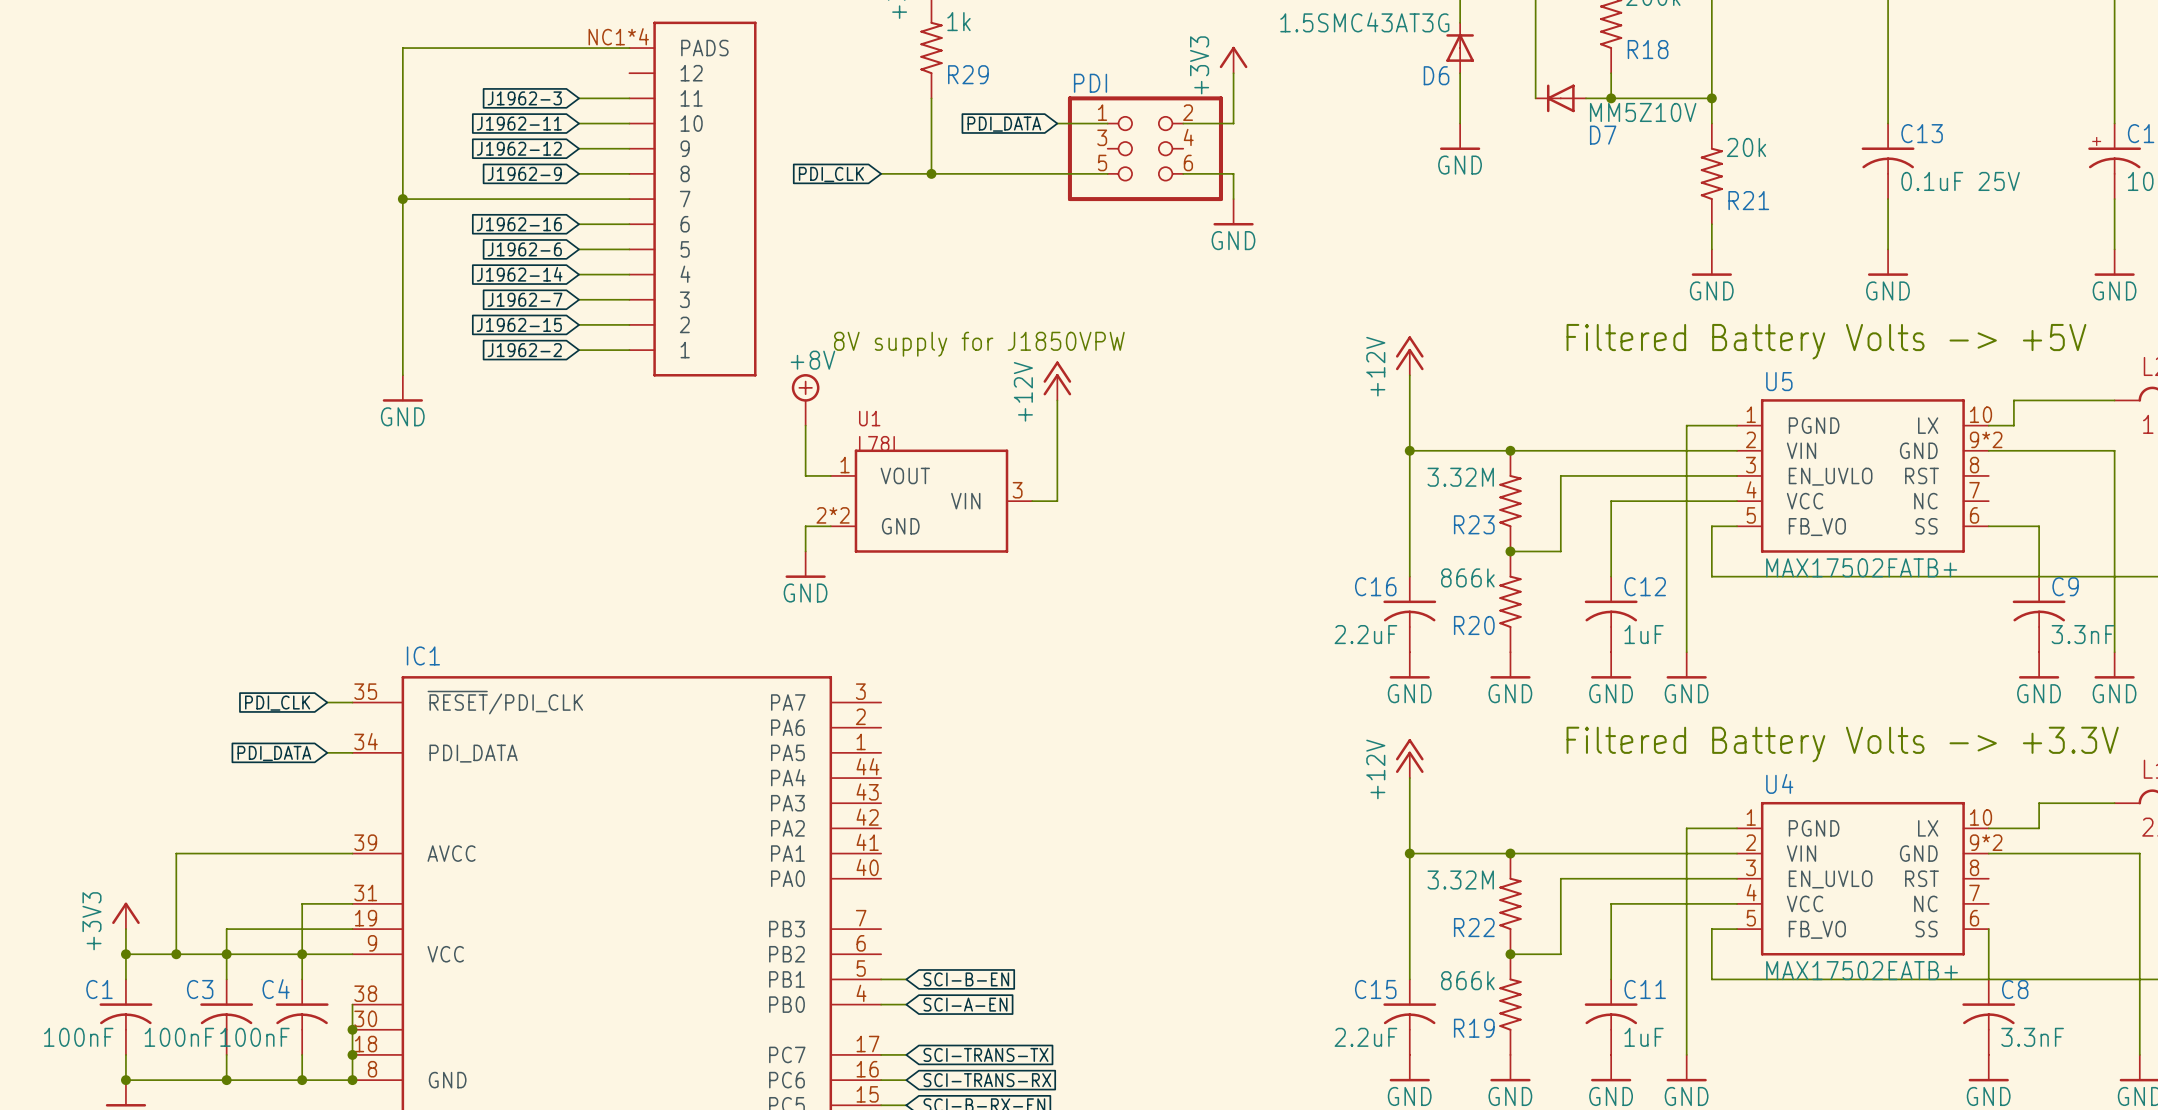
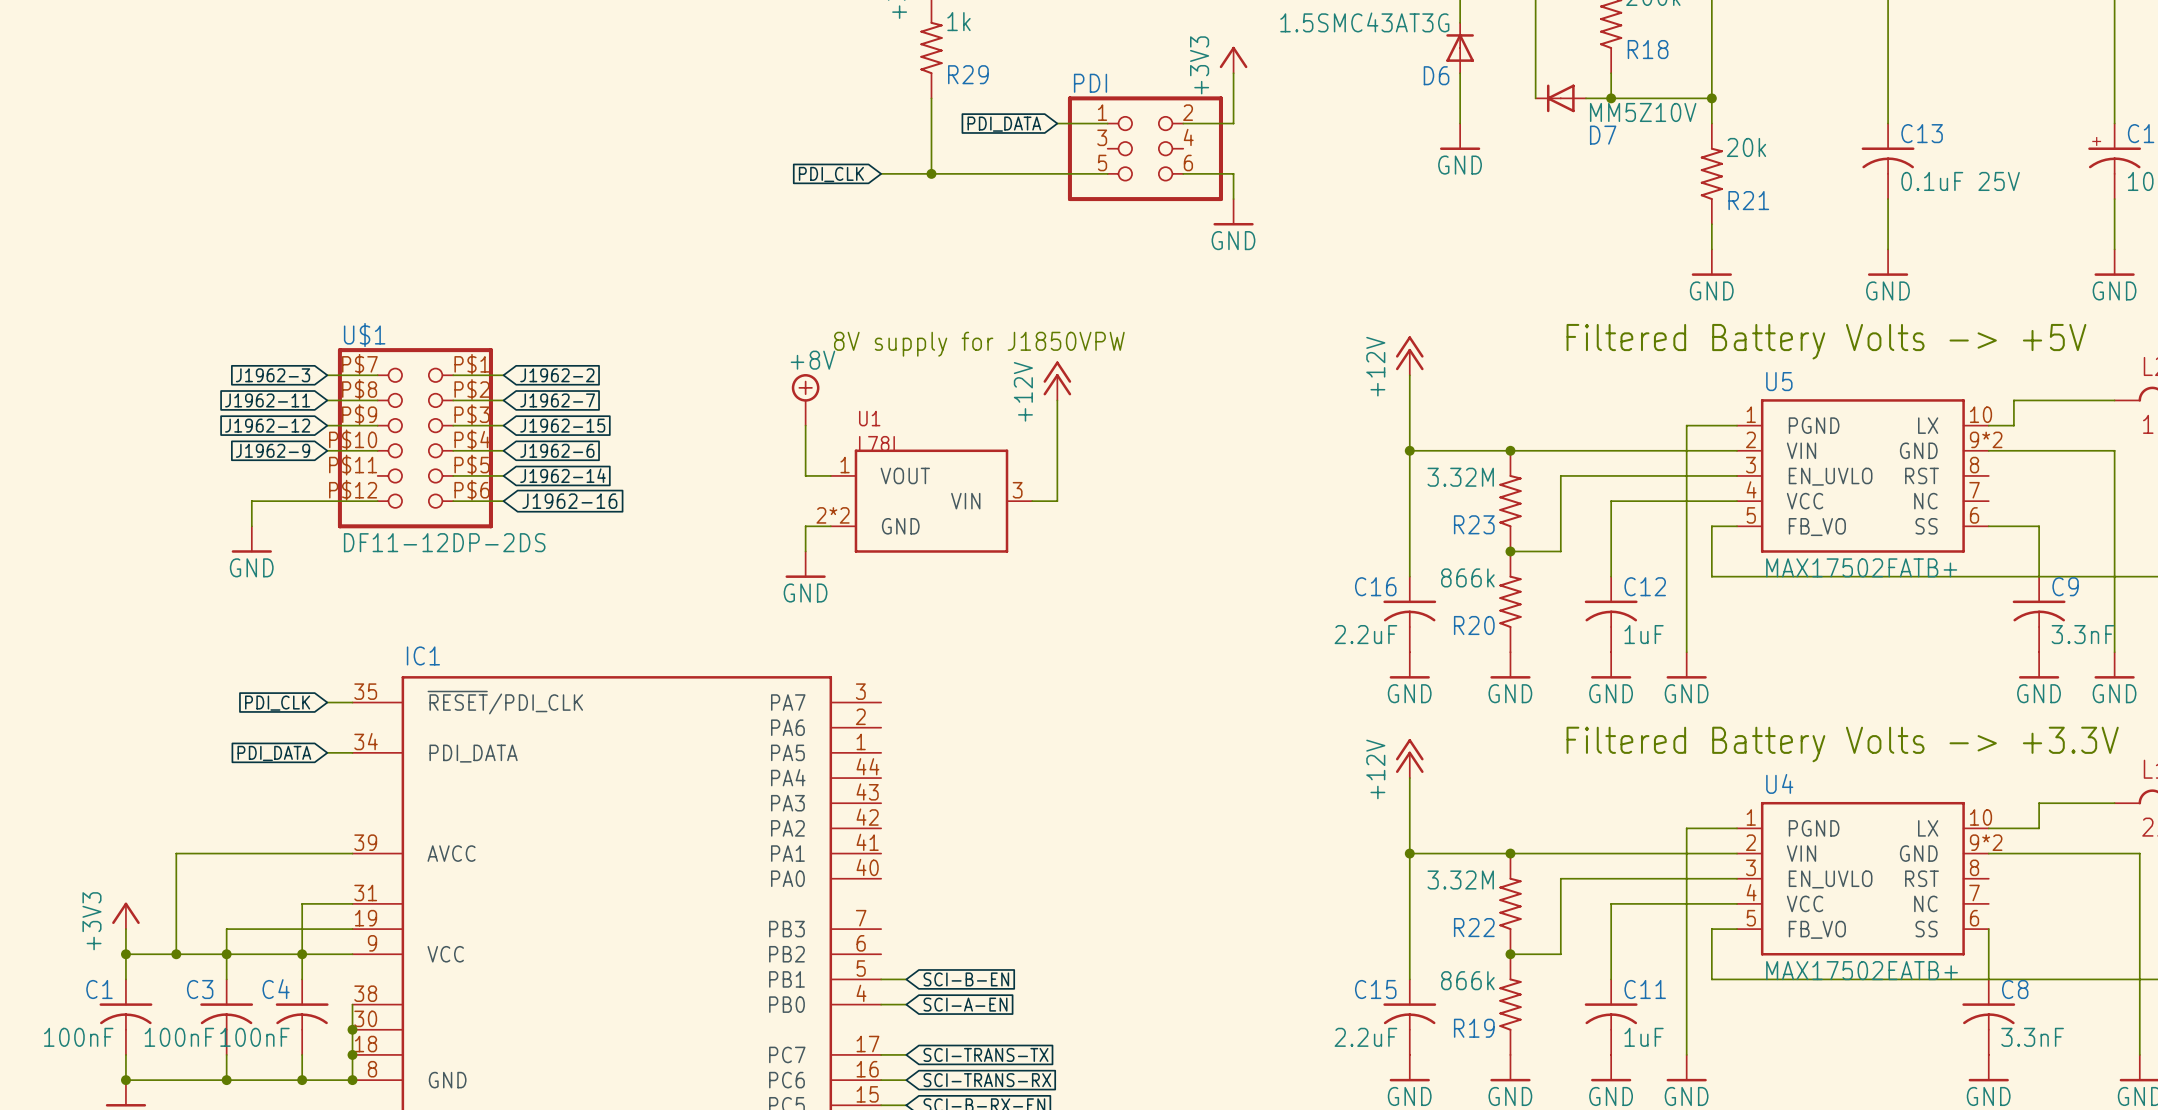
wire: (629, 48) (402, 48) (402, 375) -> none
global label: J1962-3 (524, 98) -> none
wire: (579, 98) (629, 98) -> none
global label: J1962-11 (519, 123) -> none
wire: (579, 123) (629, 123) -> none
global label: J1962-12 (519, 148) -> none
wire: (579, 148) (629, 148) -> none
global label: J1962-9 (524, 173) -> none
wire: (579, 173) (629, 173) -> none
wire: (402, 199) (629, 199) -> none
junction: (402, 199) -> none
part: (692, 199) -> none
global label: J1962-16 (519, 224) -> none
wire: (579, 224) (629, 224) -> (453, 375) (503, 375)
global label rotation: 0° (524, 249) -> 180° (557, 450)
global label position: J1962-6 (524, 249) -> J1962-6 (557, 450)
wire: (579, 249) (629, 249) -> (453, 400) (503, 400)
global label rotation: 0° (519, 274) -> 180° (563, 475)
global label position: J1962-14 (519, 274) -> J1962-14 (563, 475)
wire: (579, 274) (629, 274) -> (453, 425) (503, 425)
global label rotation: 0° (525, 299) -> 180° (557, 400)
wire: (579, 299) (629, 299) -> (453, 450) (503, 450)
global label rotation: 0° (519, 324) -> 180° (562, 425)
wire: (579, 324) (629, 324) -> (453, 475) (503, 475)
global label rotation: 0° (524, 350) -> 180° (557, 375)
wire: (579, 350) (629, 350) -> (453, 501) (503, 501)
global label: none -> J1962-3 (273, 375)
wire: none -> (327, 375) (377, 375)
power symbol position: GND (402, 388) -> GND (251, 539)
global label: none -> J1962-11 (267, 400)
wire: none -> (327, 400) (377, 400)
global label: none -> J1962-12 (267, 425)
wire: none -> (327, 425) (377, 425)
U$1: none -> DF11-12DP-2DS (415, 438)
global label: none -> J1962-9 (273, 450)
wire: none -> (327, 450) (377, 450)
wire: none -> (377, 501) (251, 501) (251, 526)
global label: none -> J1962-16 (569, 501)

